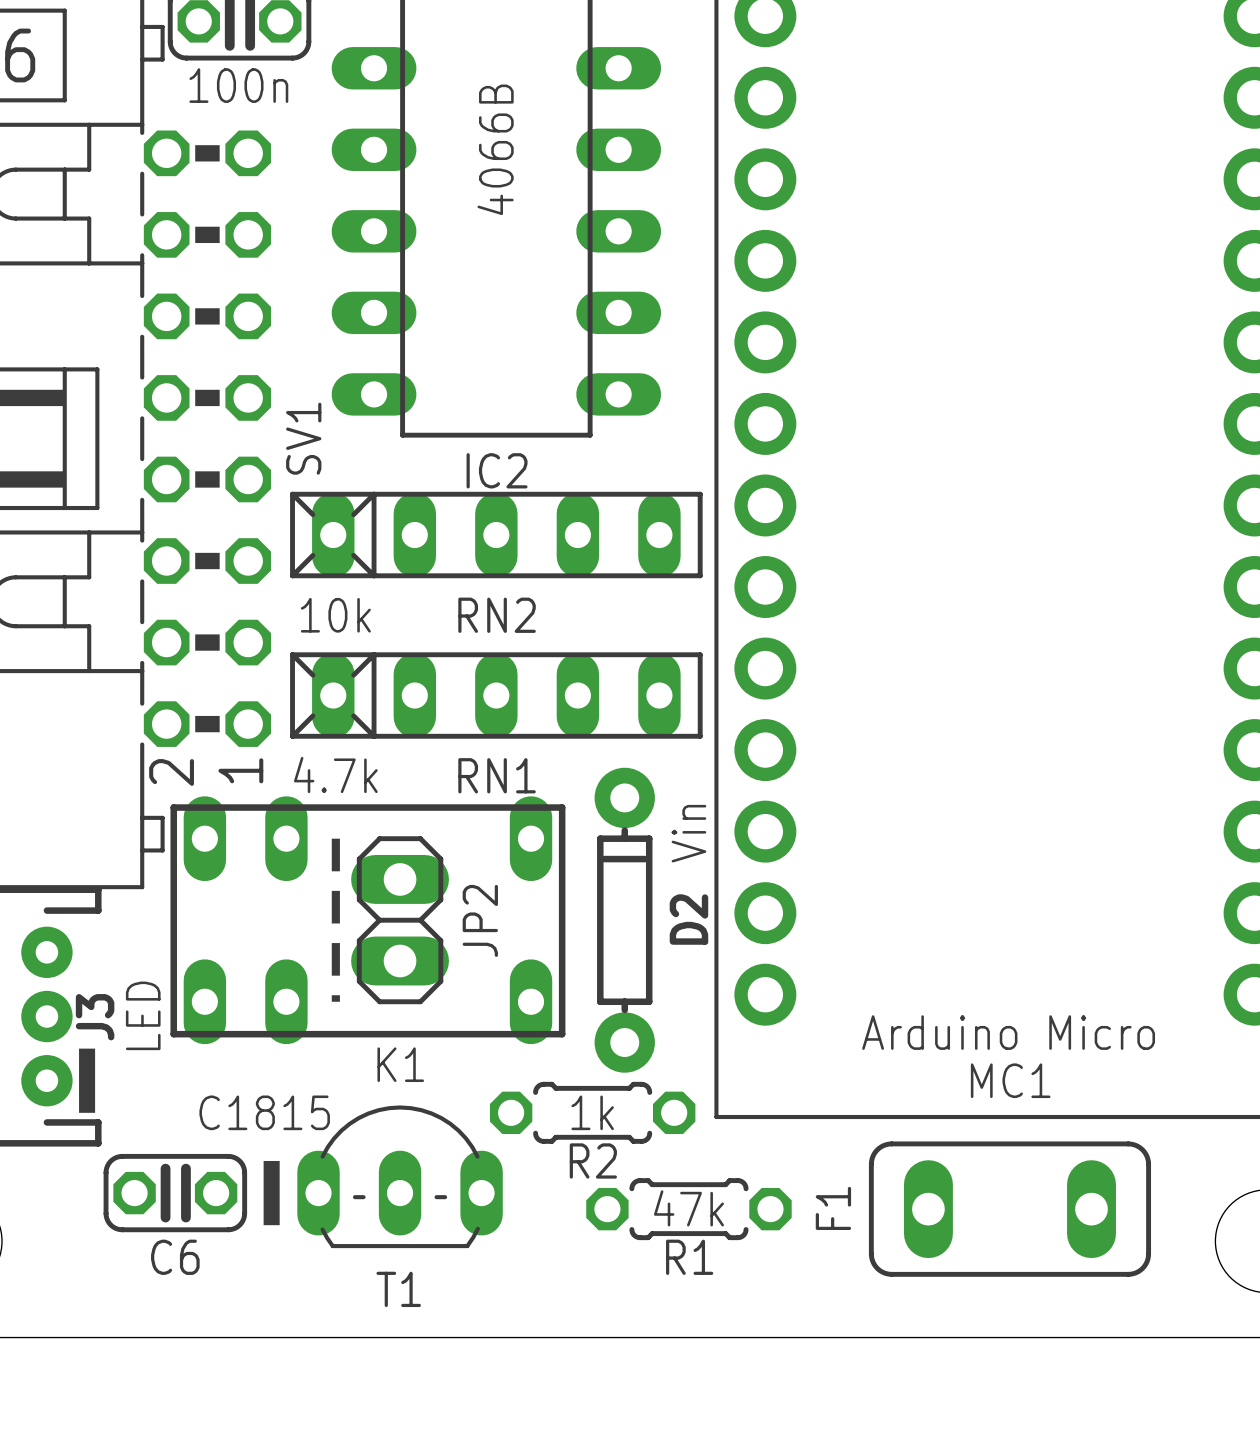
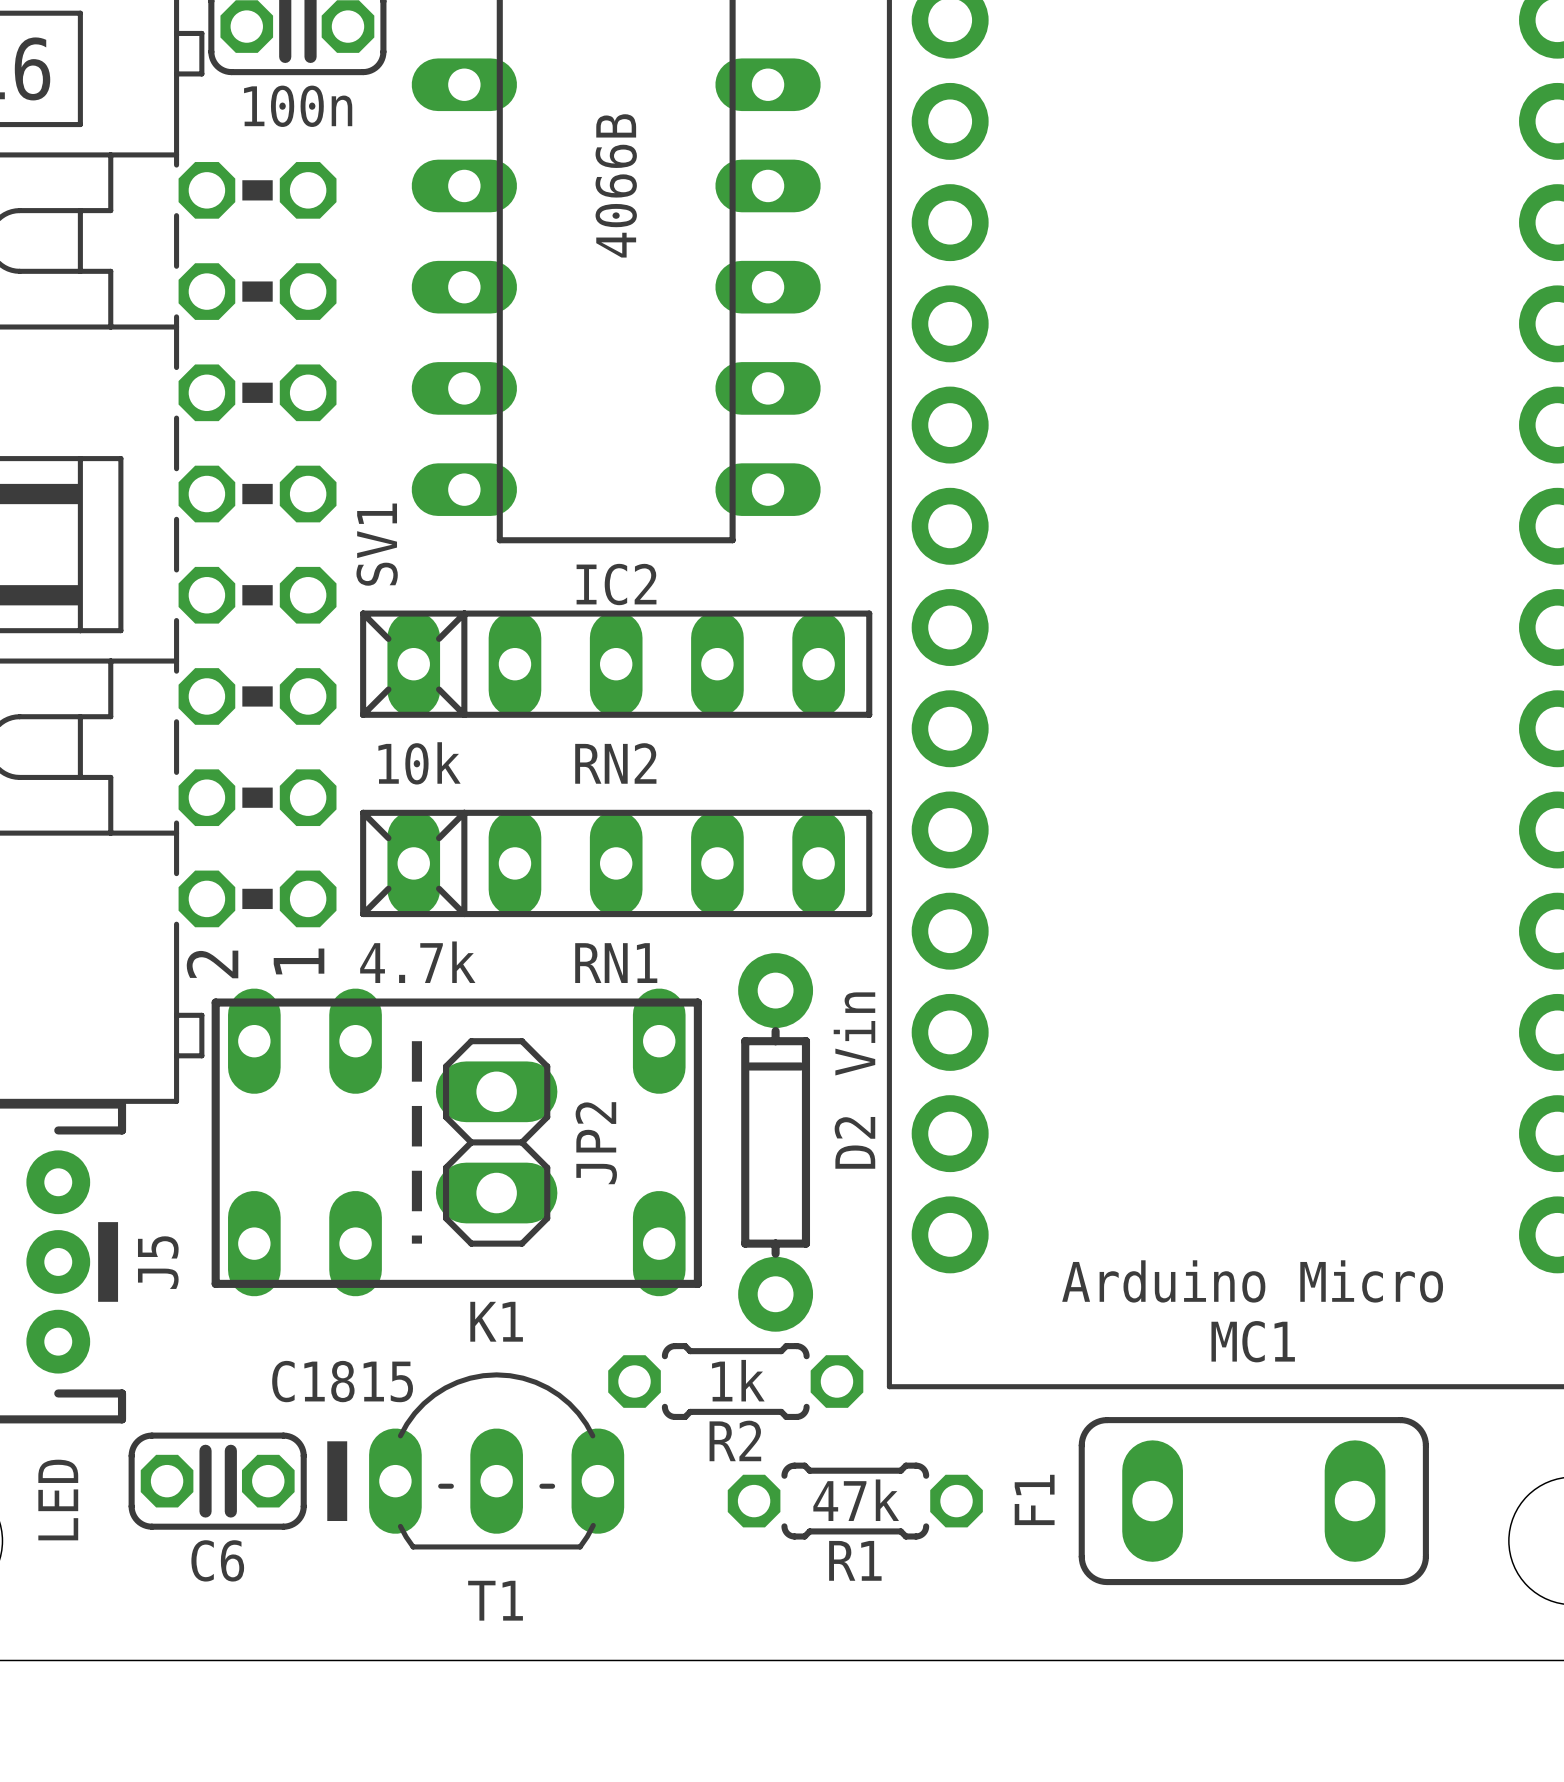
text position: LED (143, 1015) -> LED (58, 1500)
J3 name: J3 (95, 1017) -> J5 (158, 1262)
drawing position: (87, 1080) -> (108, 1261)

